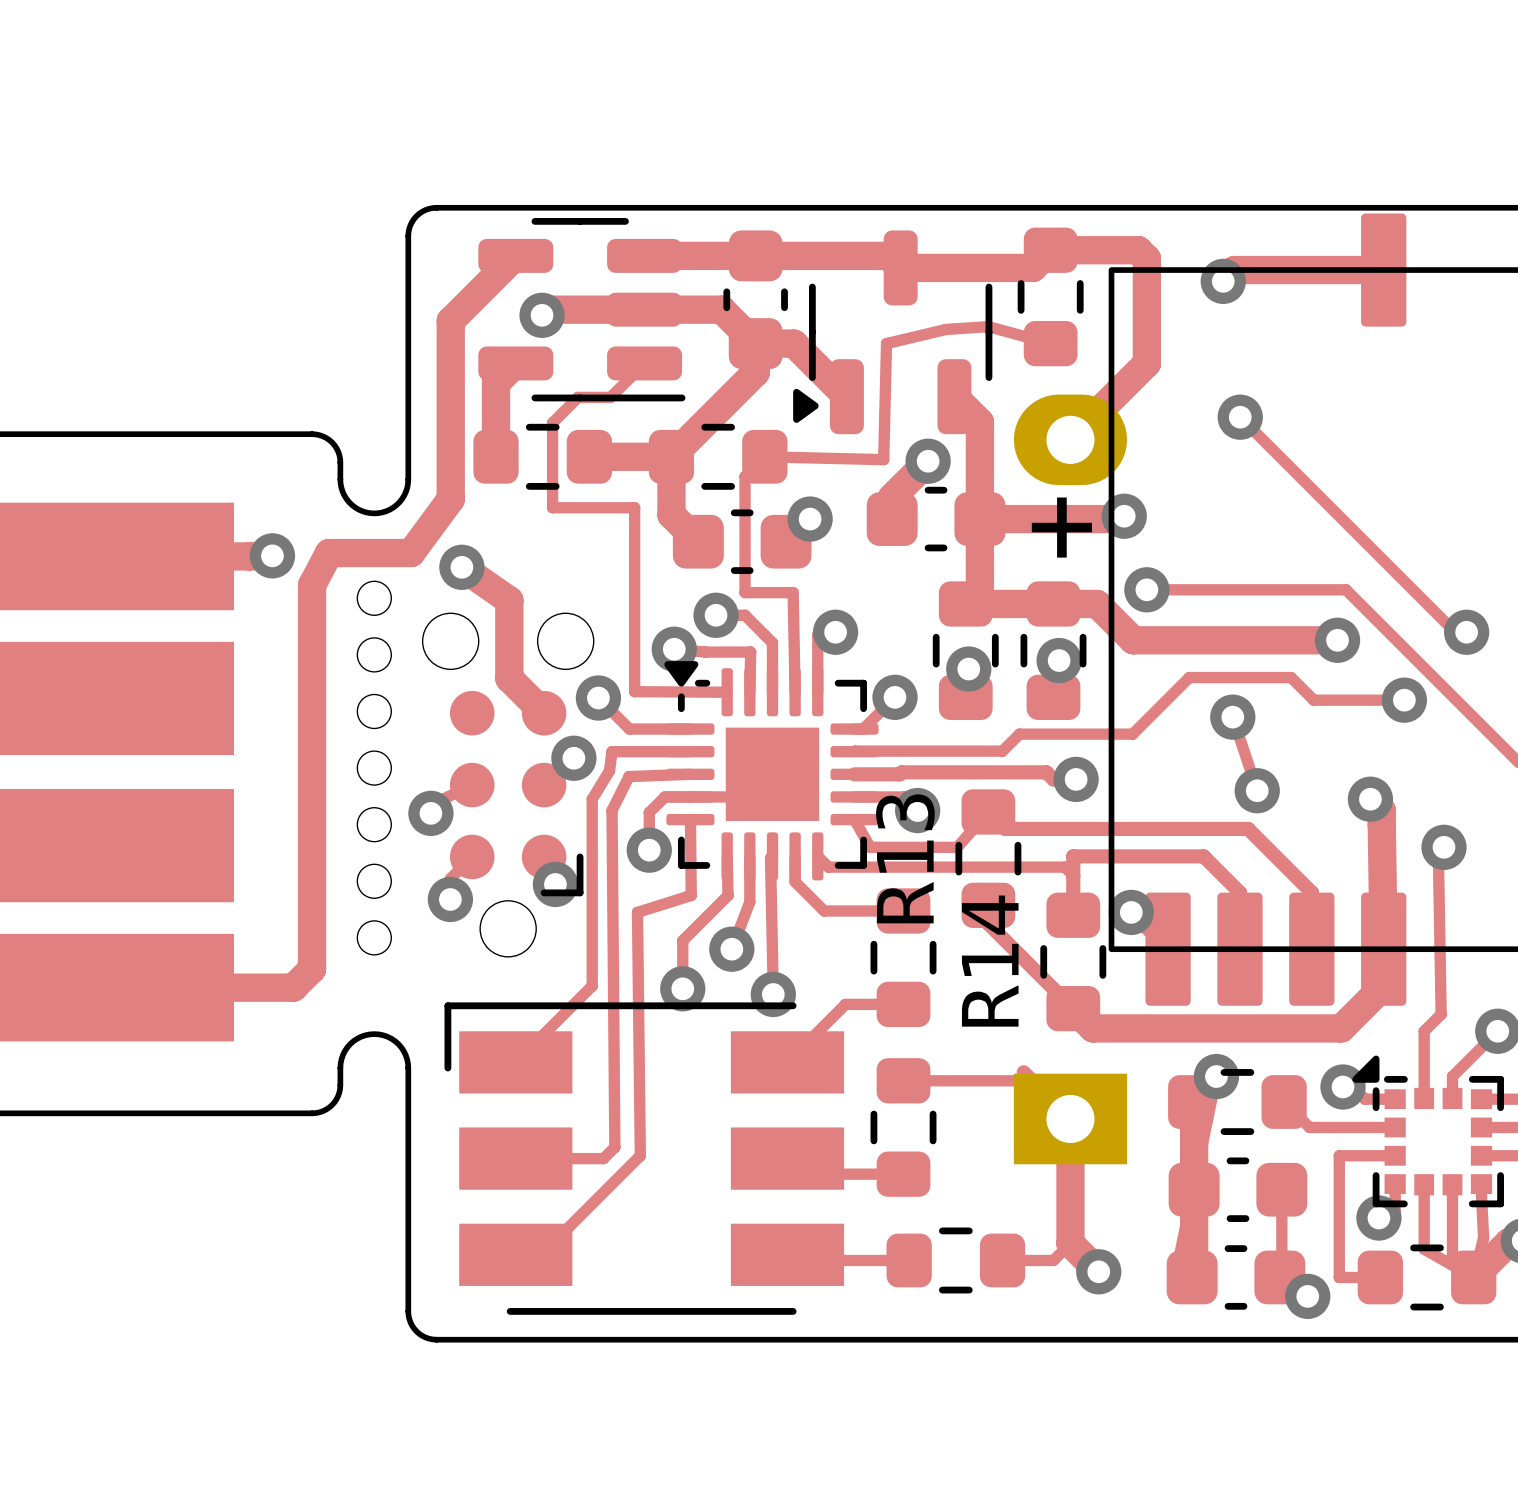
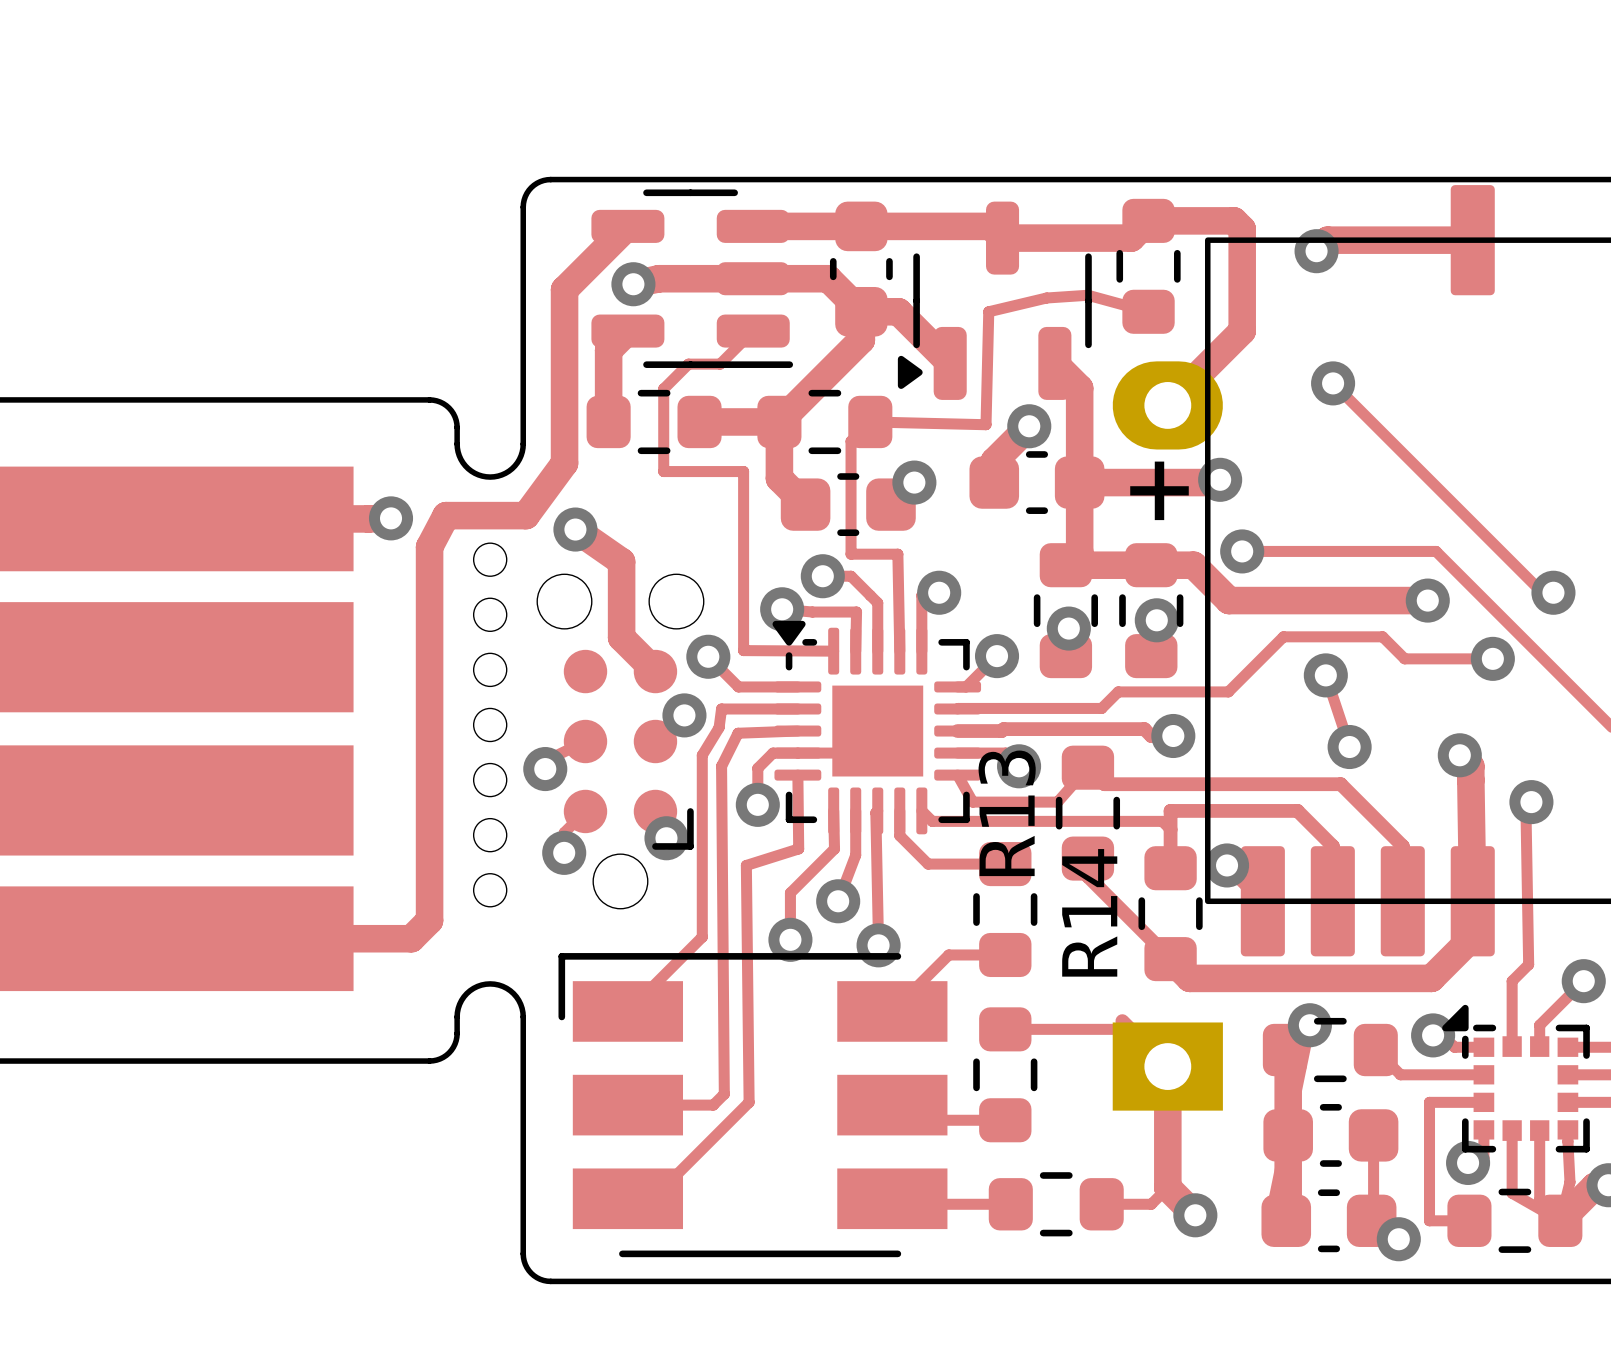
via position: (542, 315) -> (633, 284)

